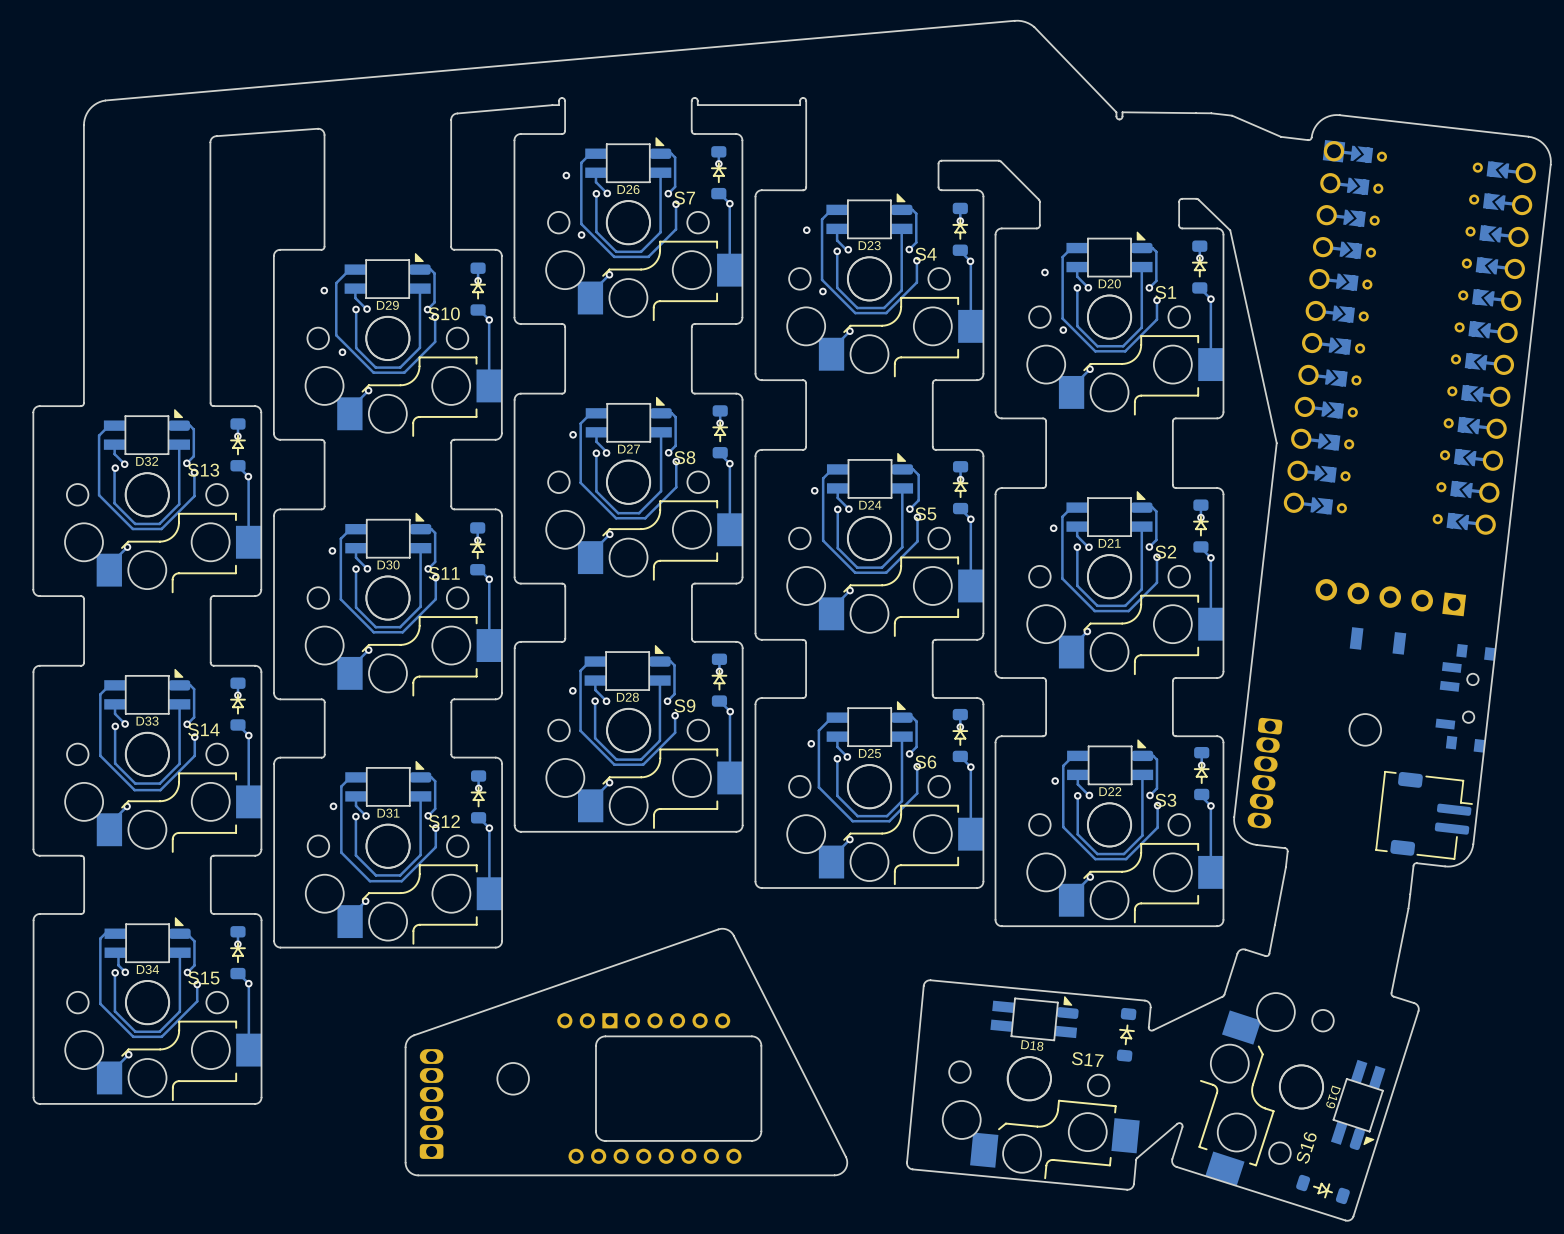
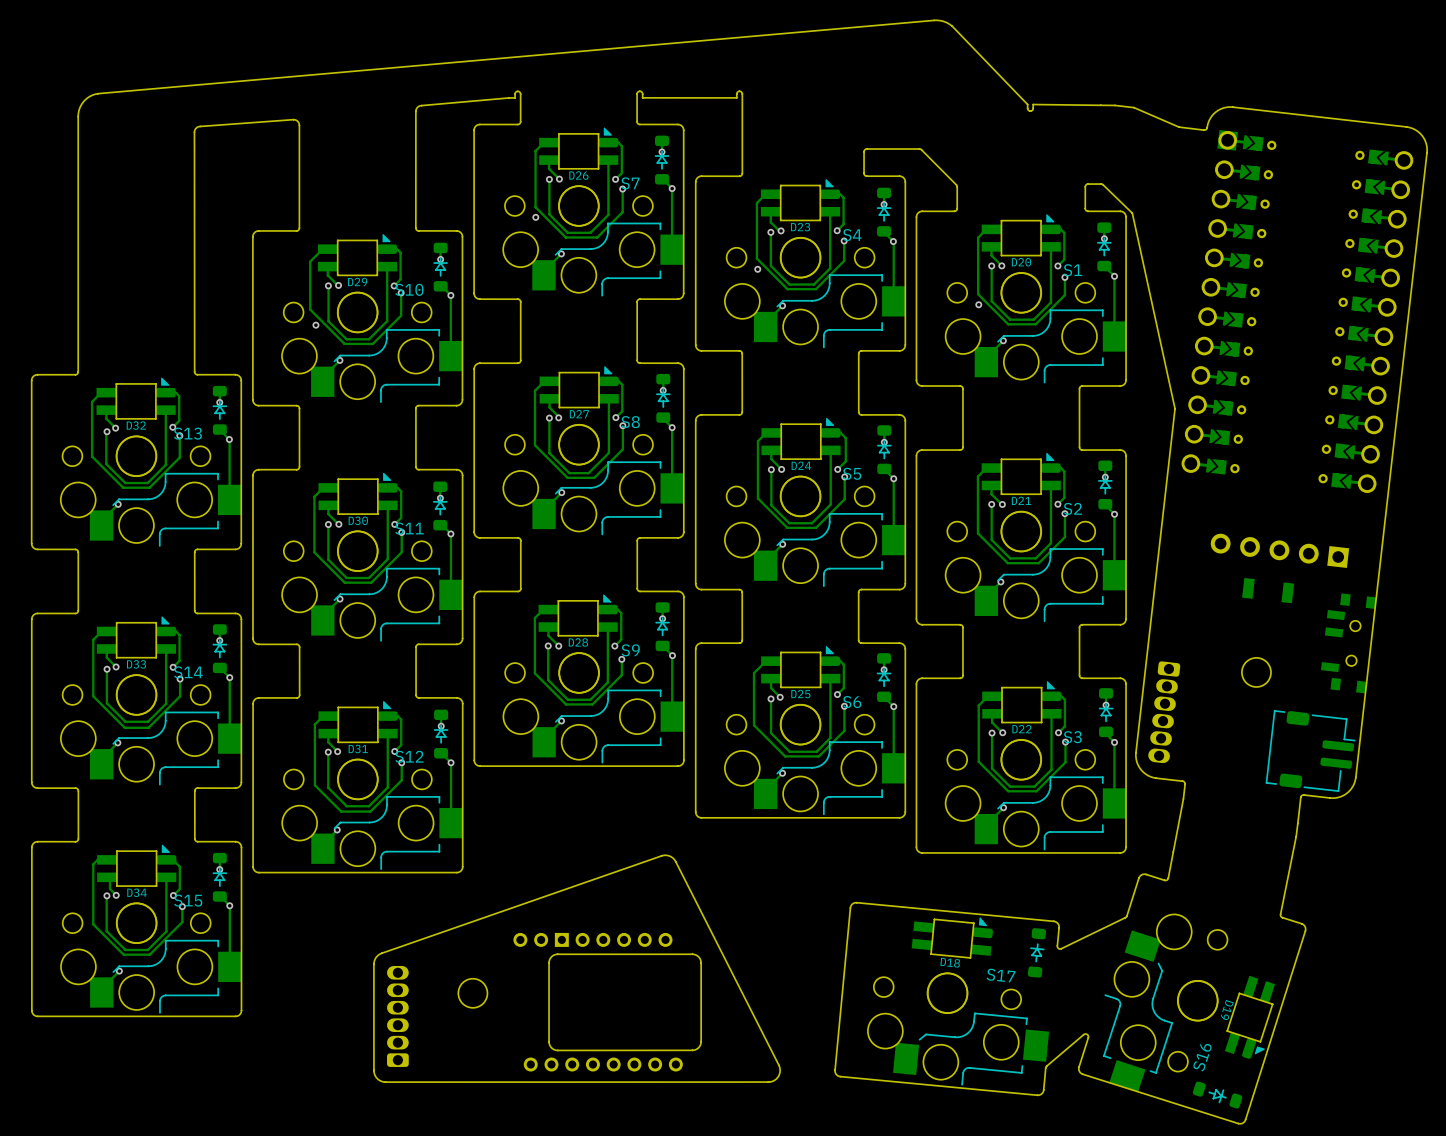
via: (566, 175) -> none
via: (806, 230) -> none
via: (1044, 272) -> none
via: (324, 290) -> none
via: (573, 434) -> none
via: (814, 490) -> none
via: (1053, 528) -> none
via: (332, 550) -> none
via: (572, 690) -> none
via: (811, 743) -> none
via: (1055, 781) -> none
via: (333, 806) -> none

